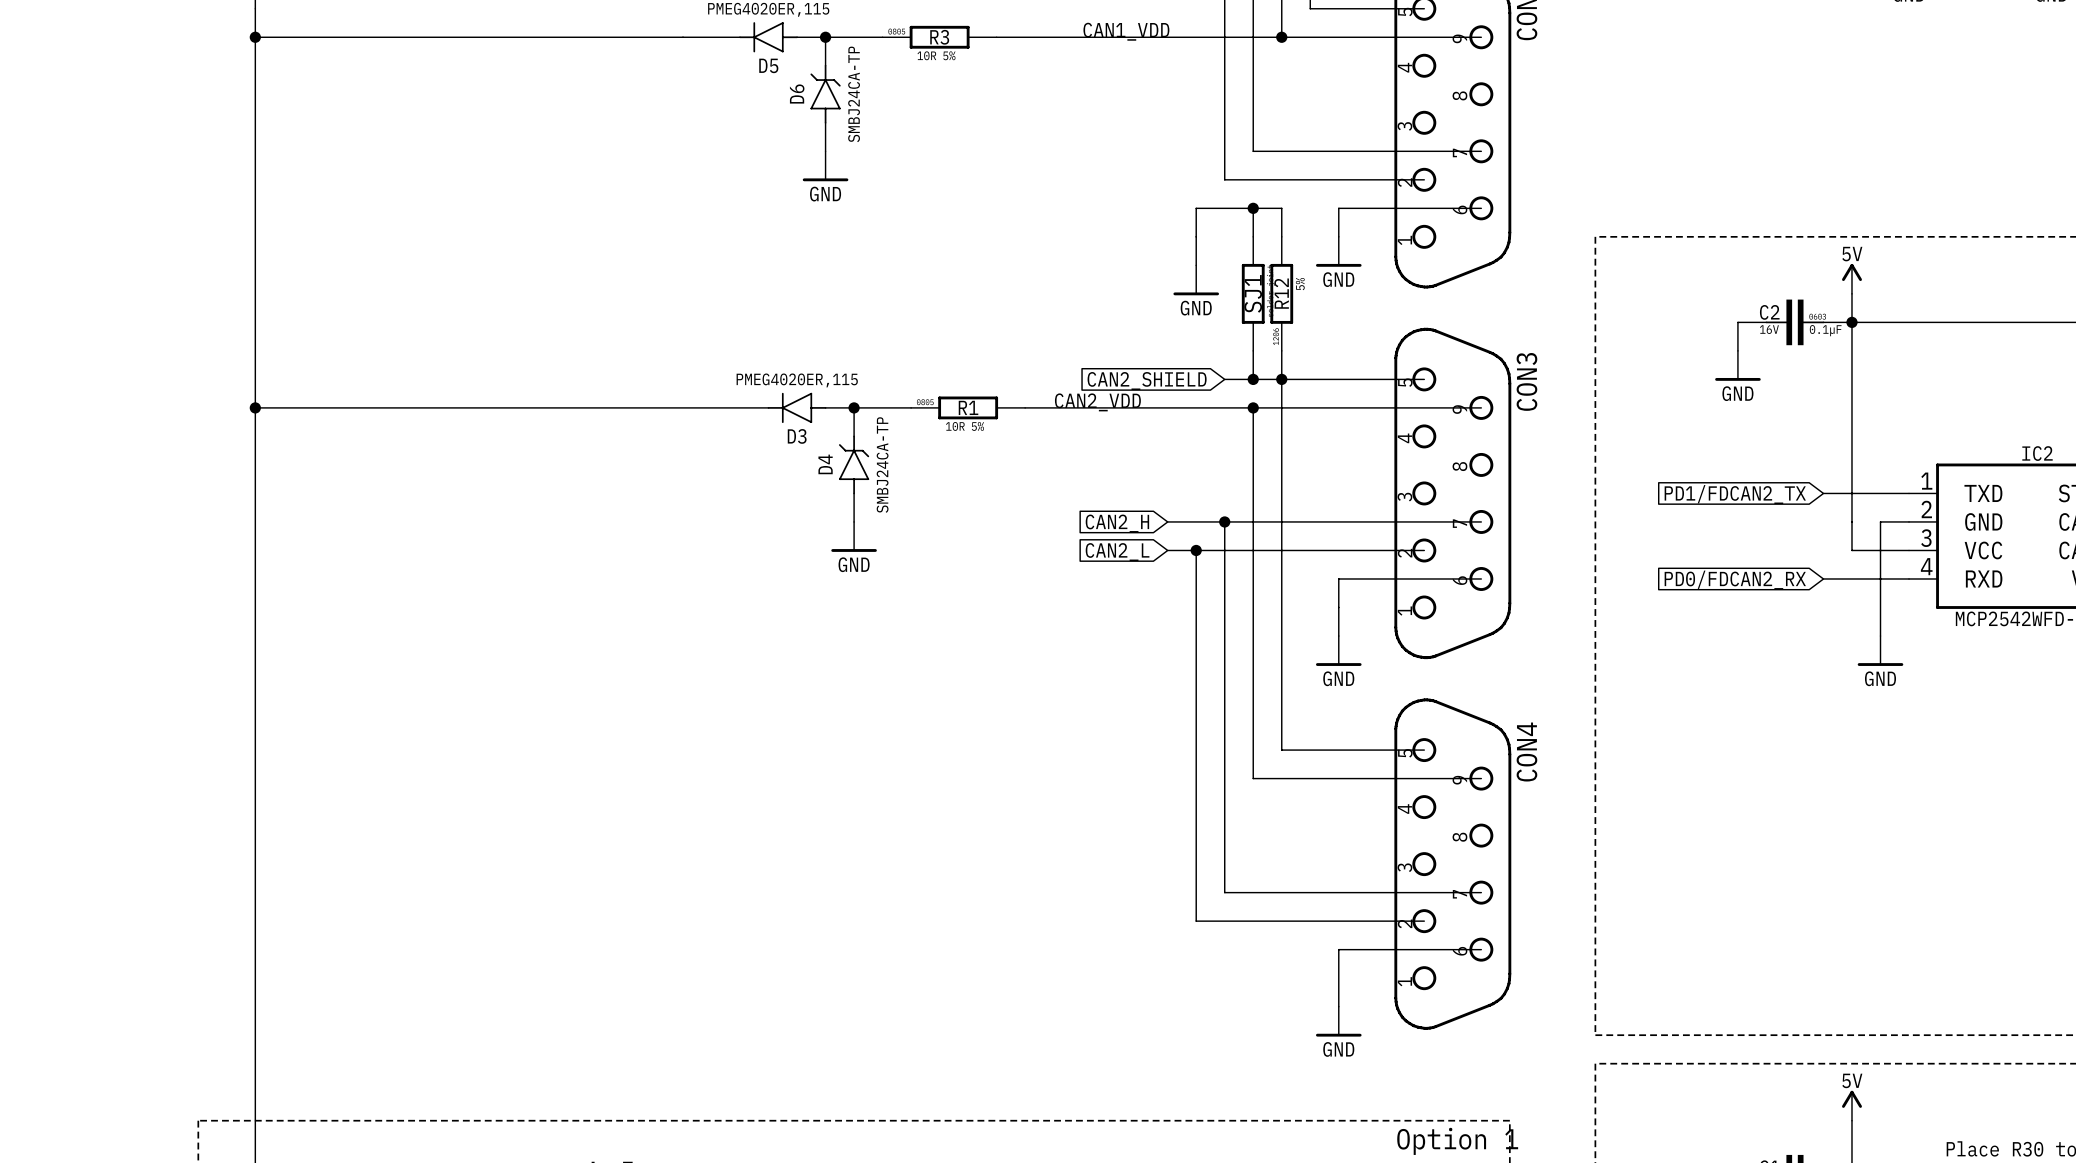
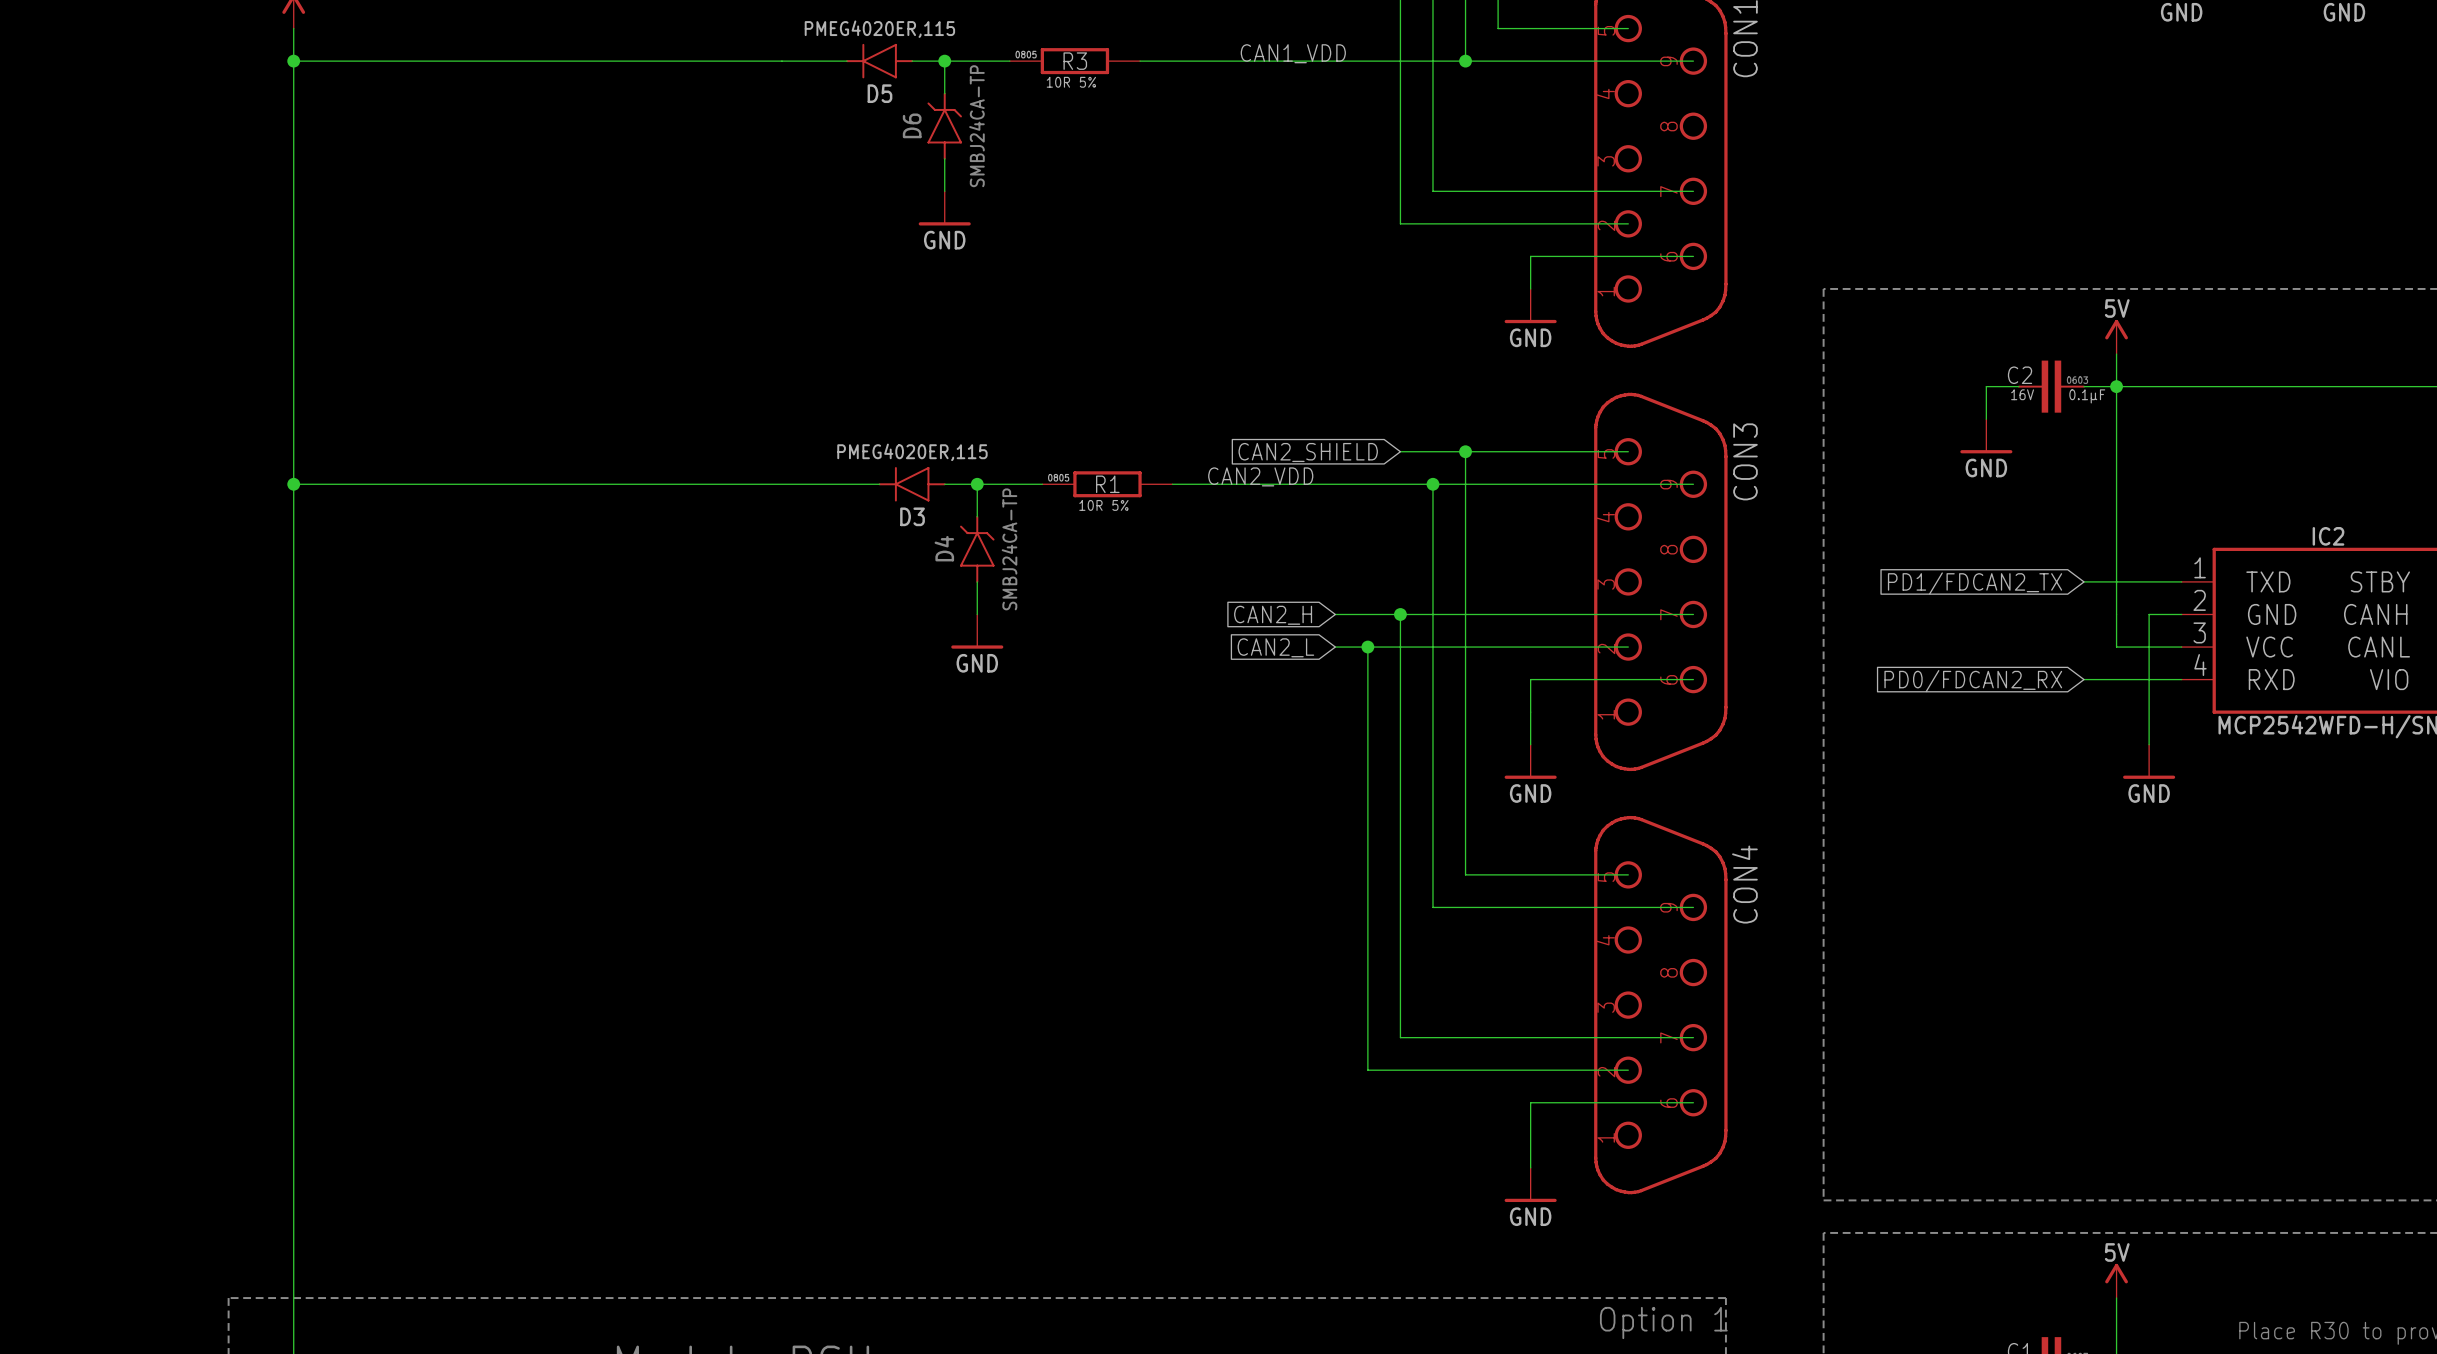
wire: (1253, 208) (1253, 236) -> none
junction: (1253, 208) -> none
wire: (1281, 236) (1281, 208) (1196, 208) (1196, 265) -> none
power symbol: GND (1196, 280) -> none
SJ1: (1253, 293) -> none
R12: (1281, 293) -> none
wire: (1253, 350) (1253, 379) -> none
wire: (1281, 350) (1281, 379) -> none
junction: (1253, 379) -> none

